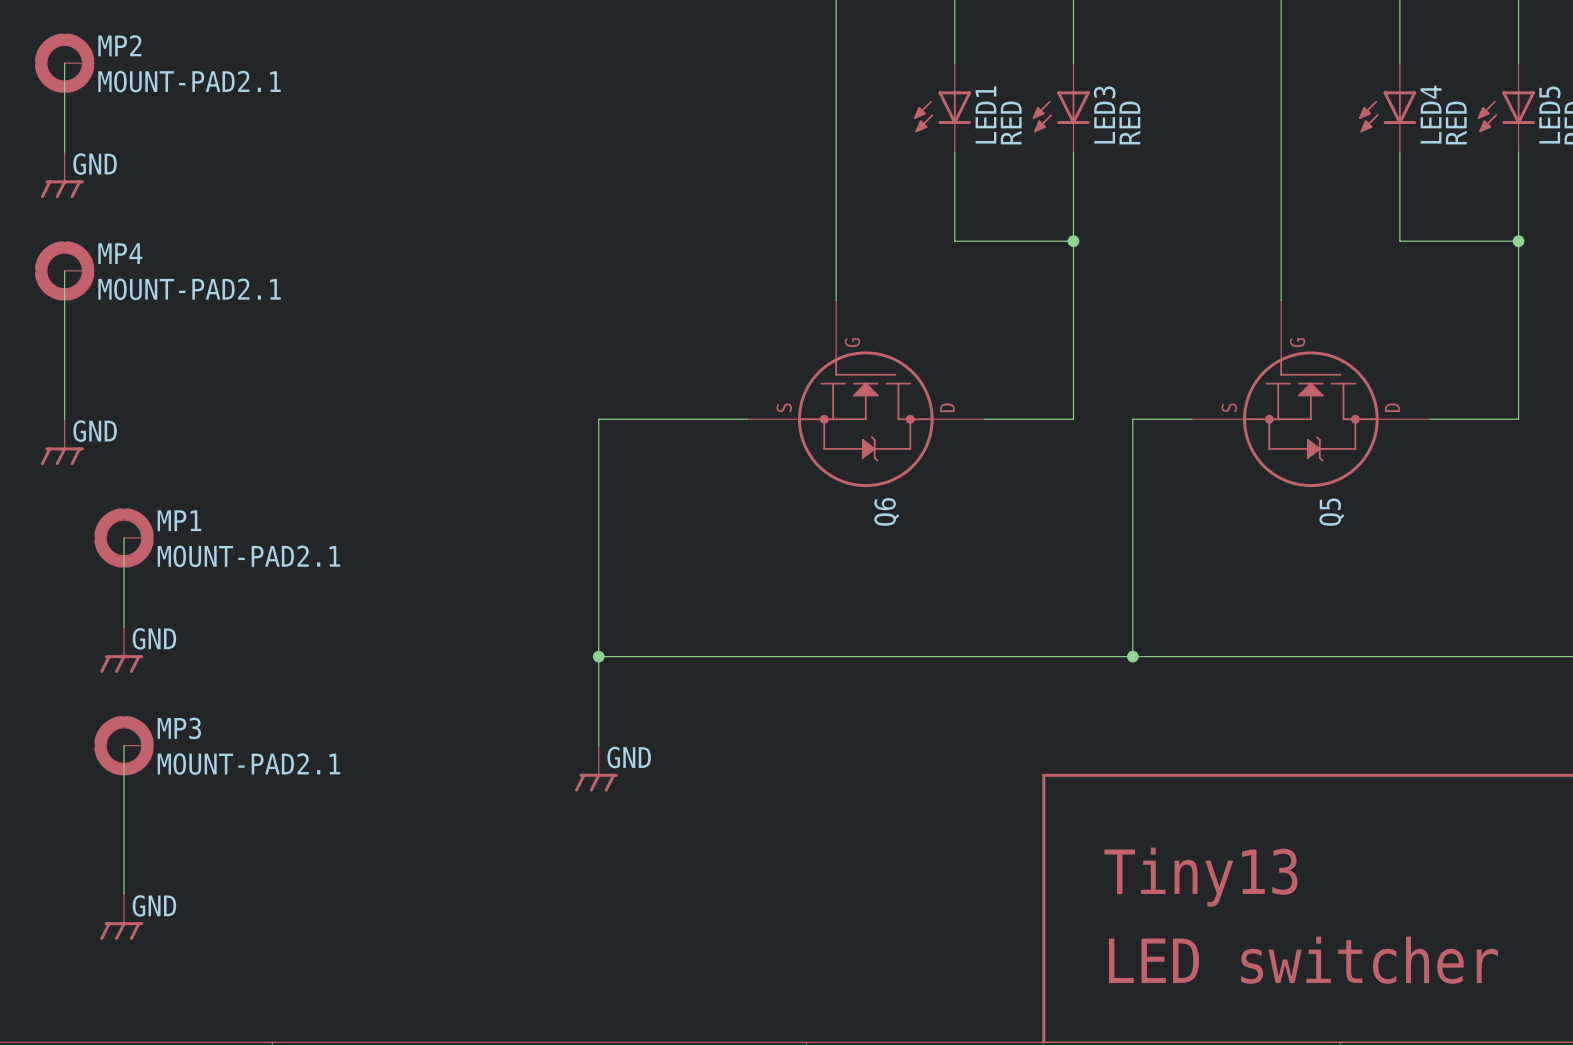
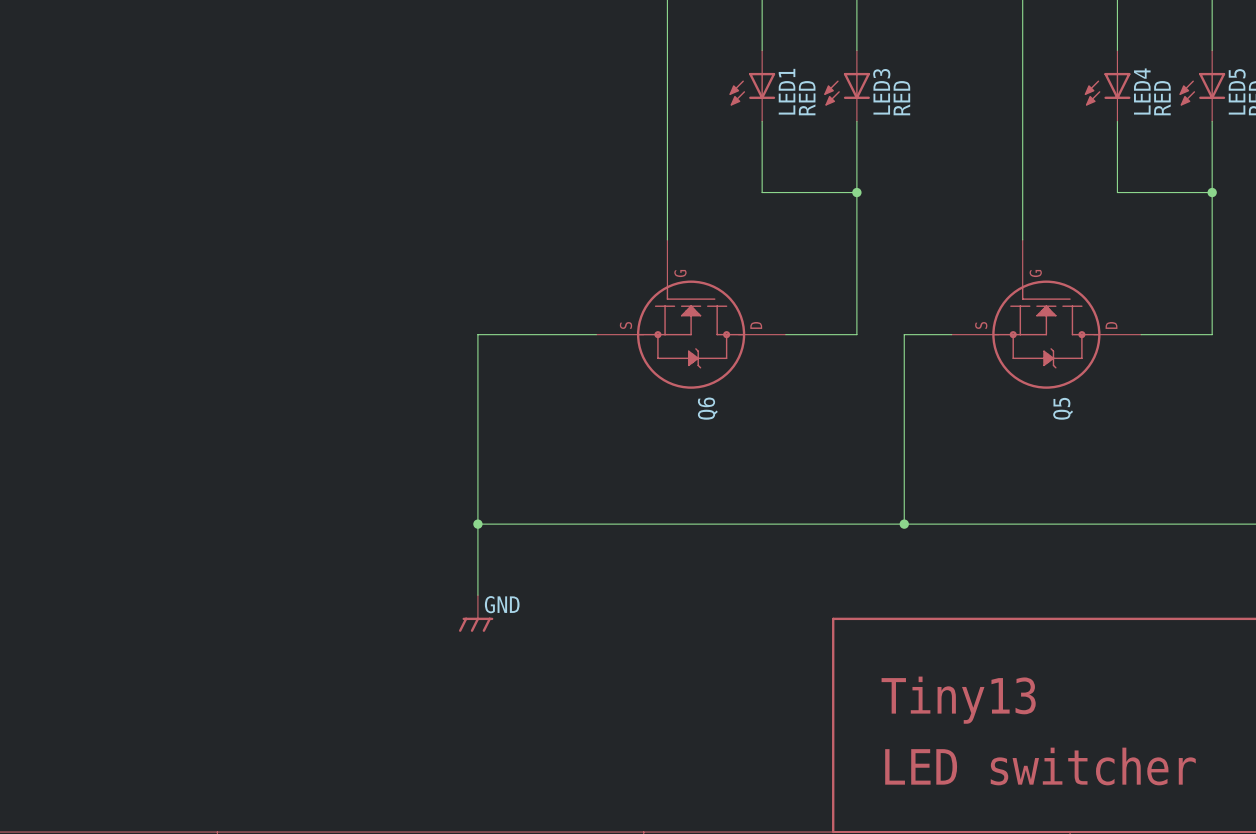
wire: (64, 63) (64, 152) -> none
MP2: MOUNT-PAD2.1 (64, 63) -> none
power symbol: GND (62, 175) -> none
wire: (64, 270) (64, 419) -> none
MP4: MOUNT-PAD2.1 (64, 270) -> none
power symbol: GND (62, 442) -> none
wire: (123, 537) (123, 626) -> none
MP1: MOUNT-PAD2.1 (123, 537) -> none
power symbol: GND (121, 649) -> none
wire: (123, 745) (123, 893) -> none
MP3: MOUNT-PAD2.1 (123, 745) -> none
power symbol: GND (121, 916) -> none

